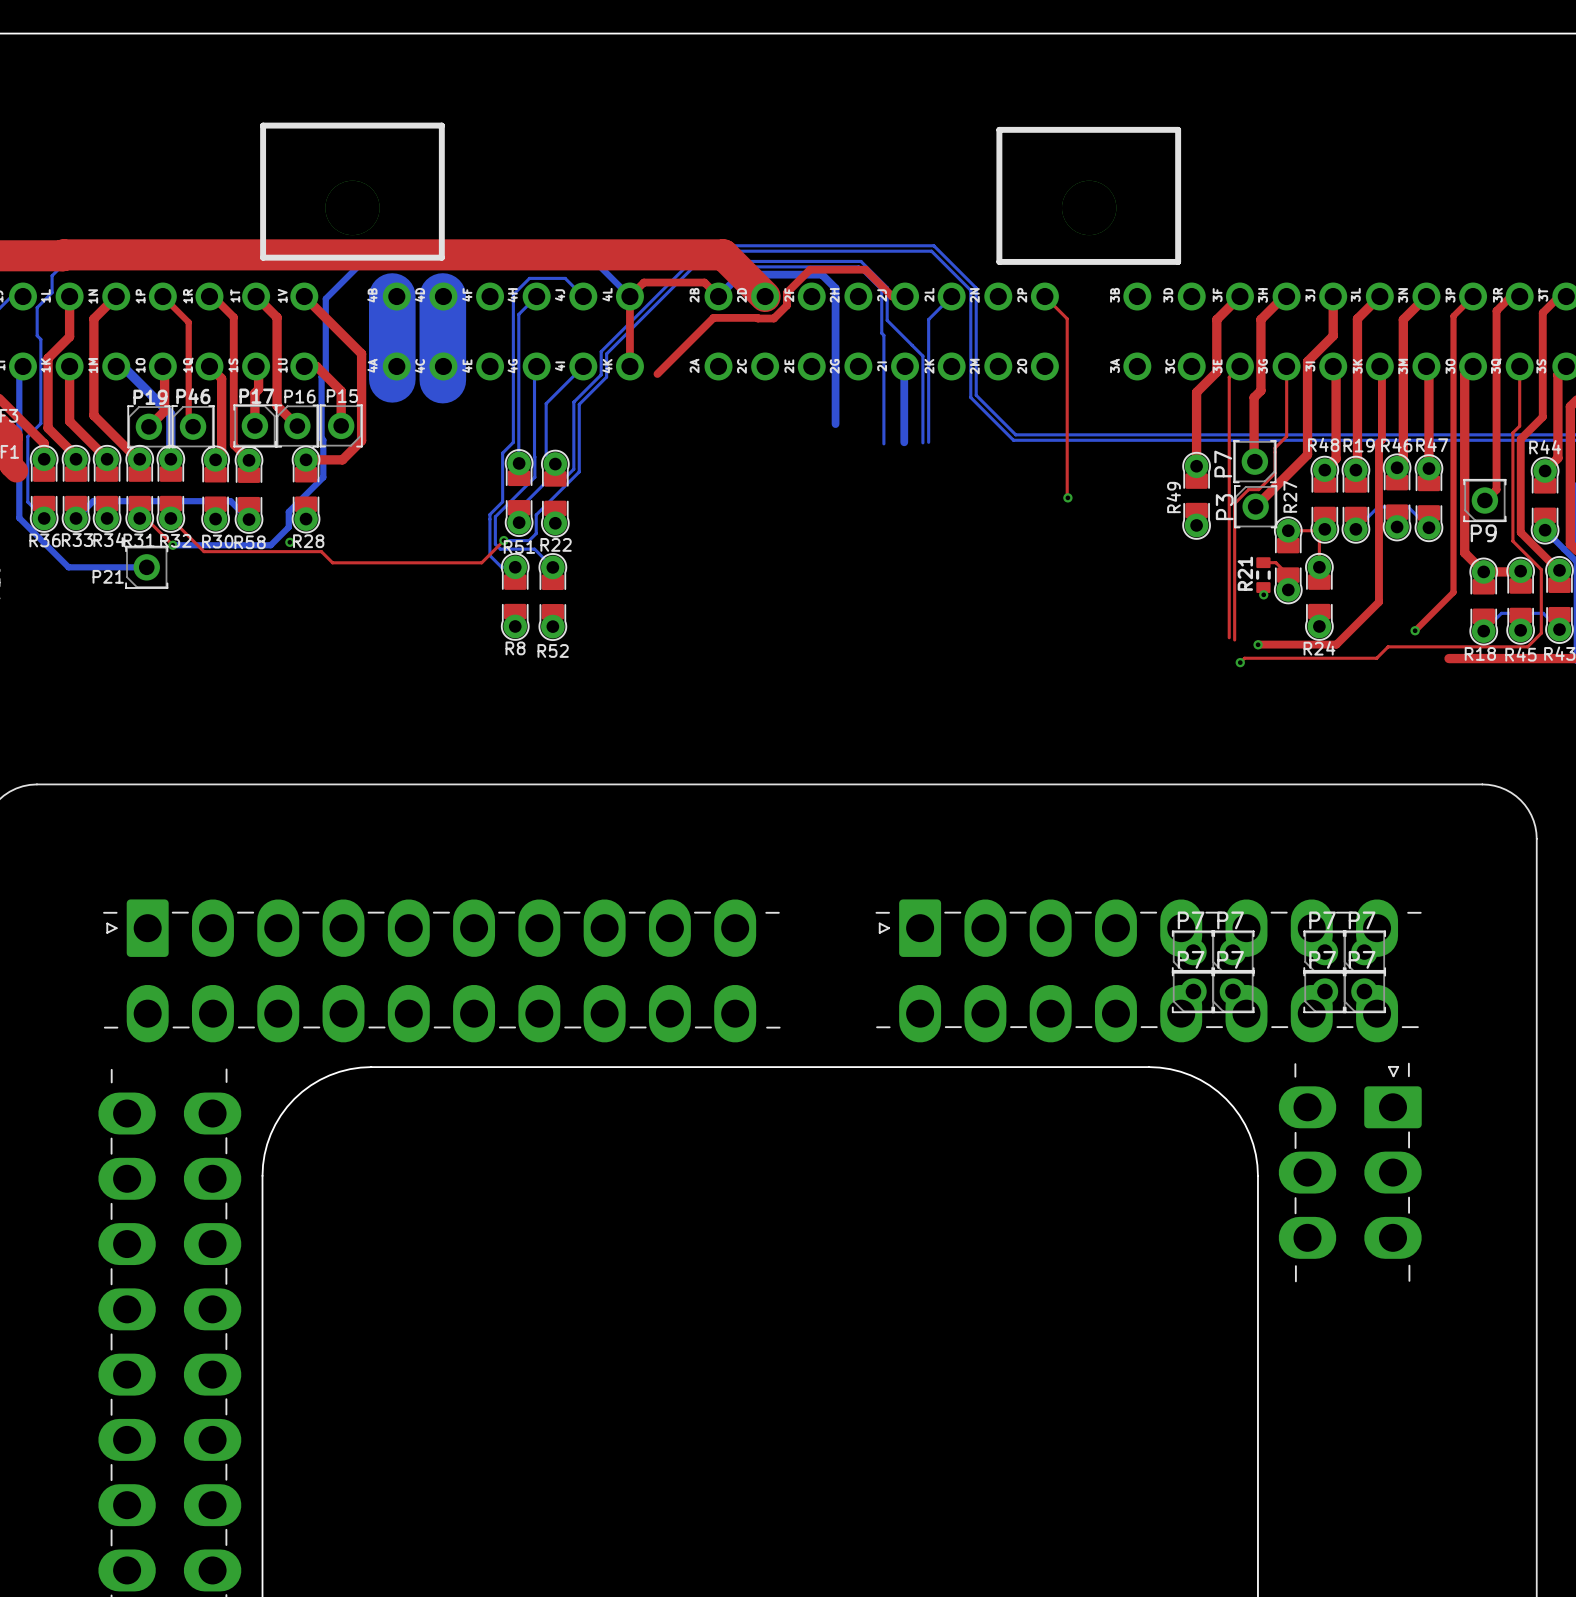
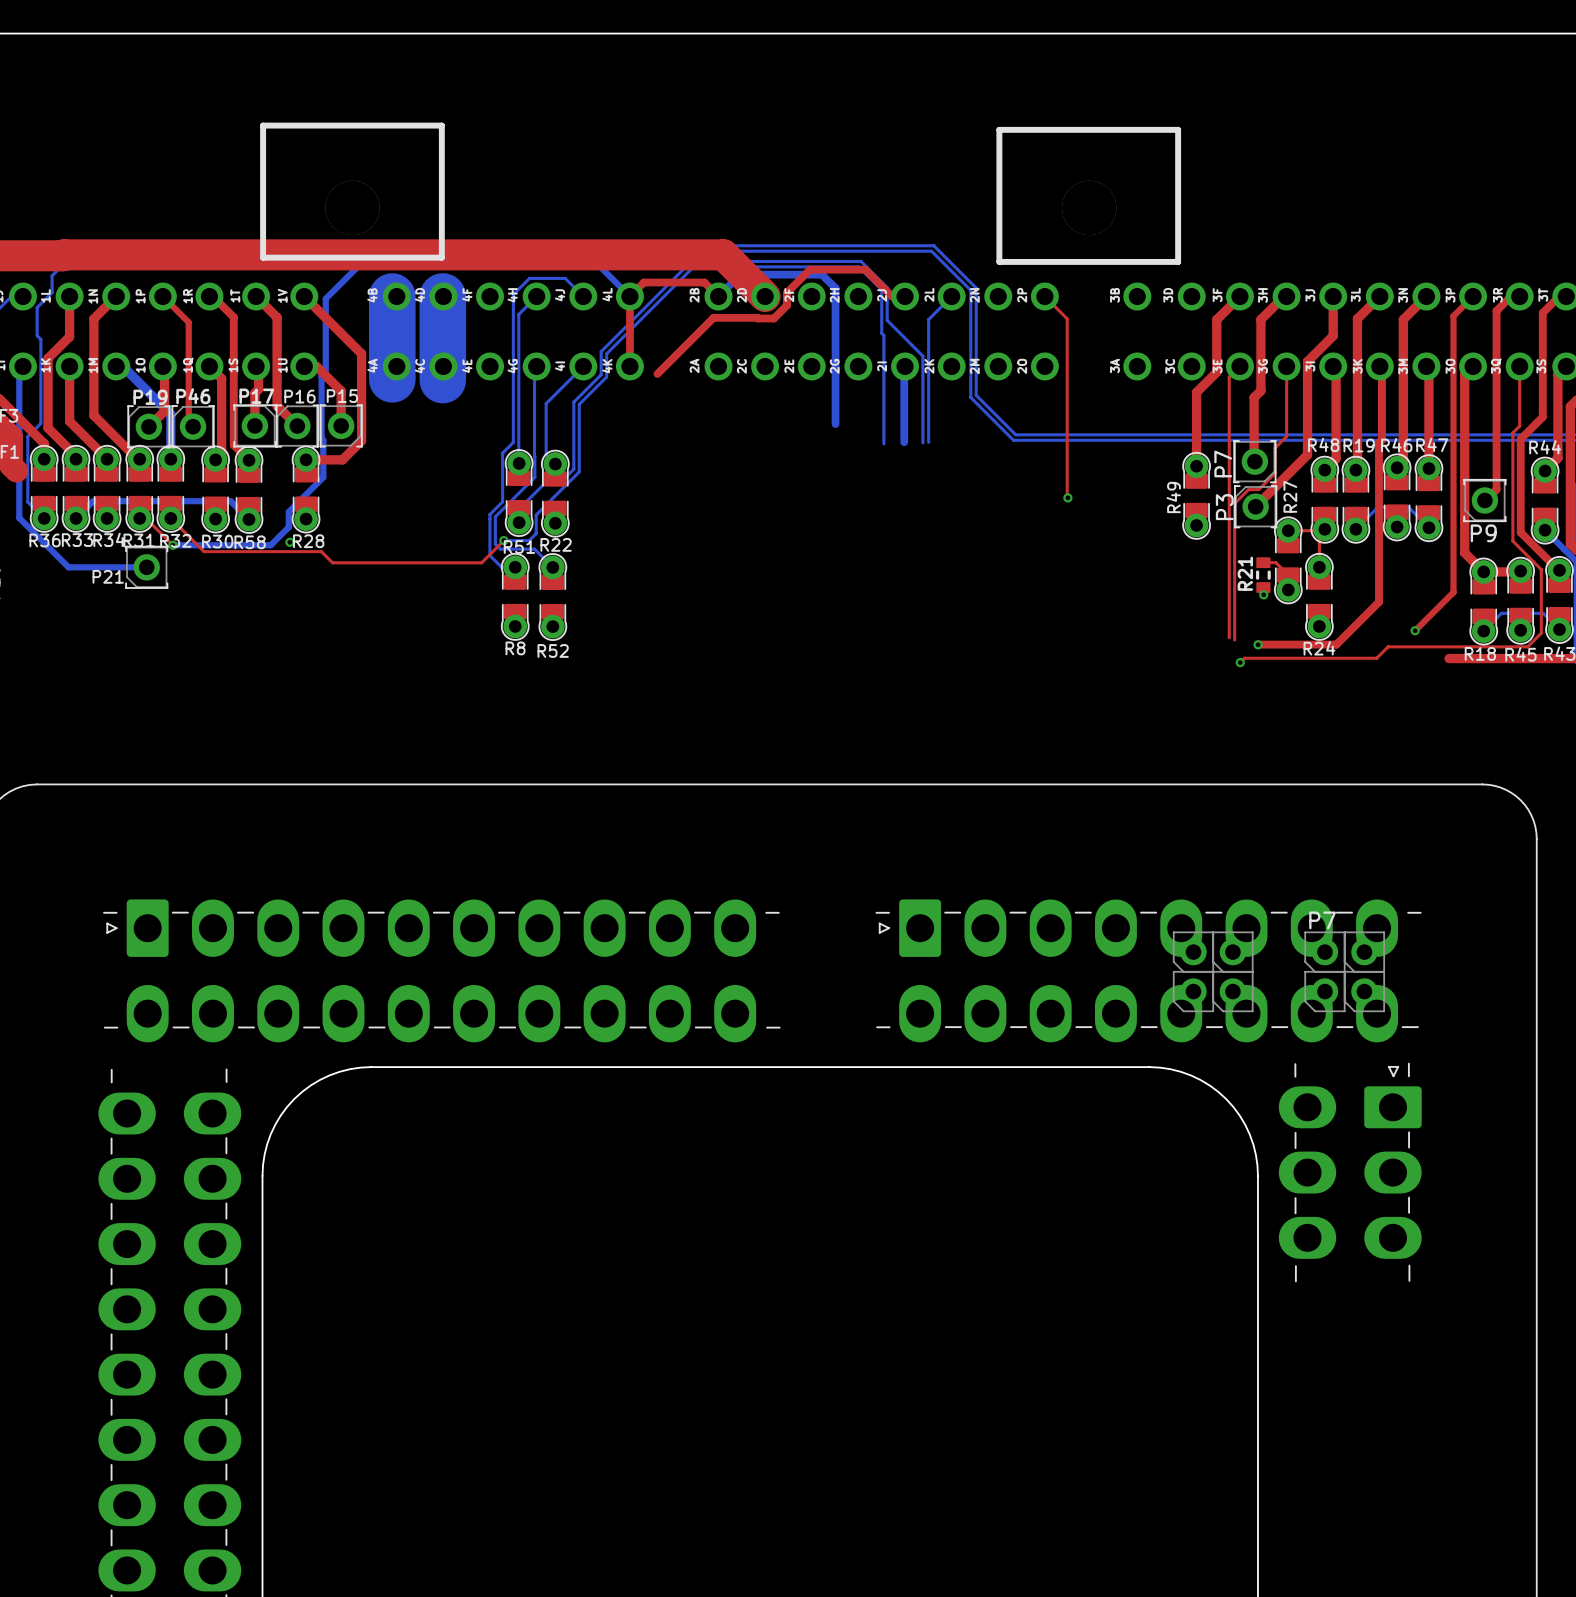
P7 footprint: [1303, 930, 1347, 974] -> [1304, 931, 1346, 973]
P7: (1193, 952) -> none
part: none -> (1193, 952)
P7: (1232, 952) -> none
part: none -> (1232, 952)
P7: (1364, 952) -> none
part: none -> (1364, 952)
P7: (1193, 991) -> none
part: none -> (1193, 991)
P7: (1232, 991) -> none
part: none -> (1232, 991)
P7: (1324, 991) -> none
part: none -> (1324, 991)
P7: (1364, 991) -> none
part: none -> (1364, 991)

